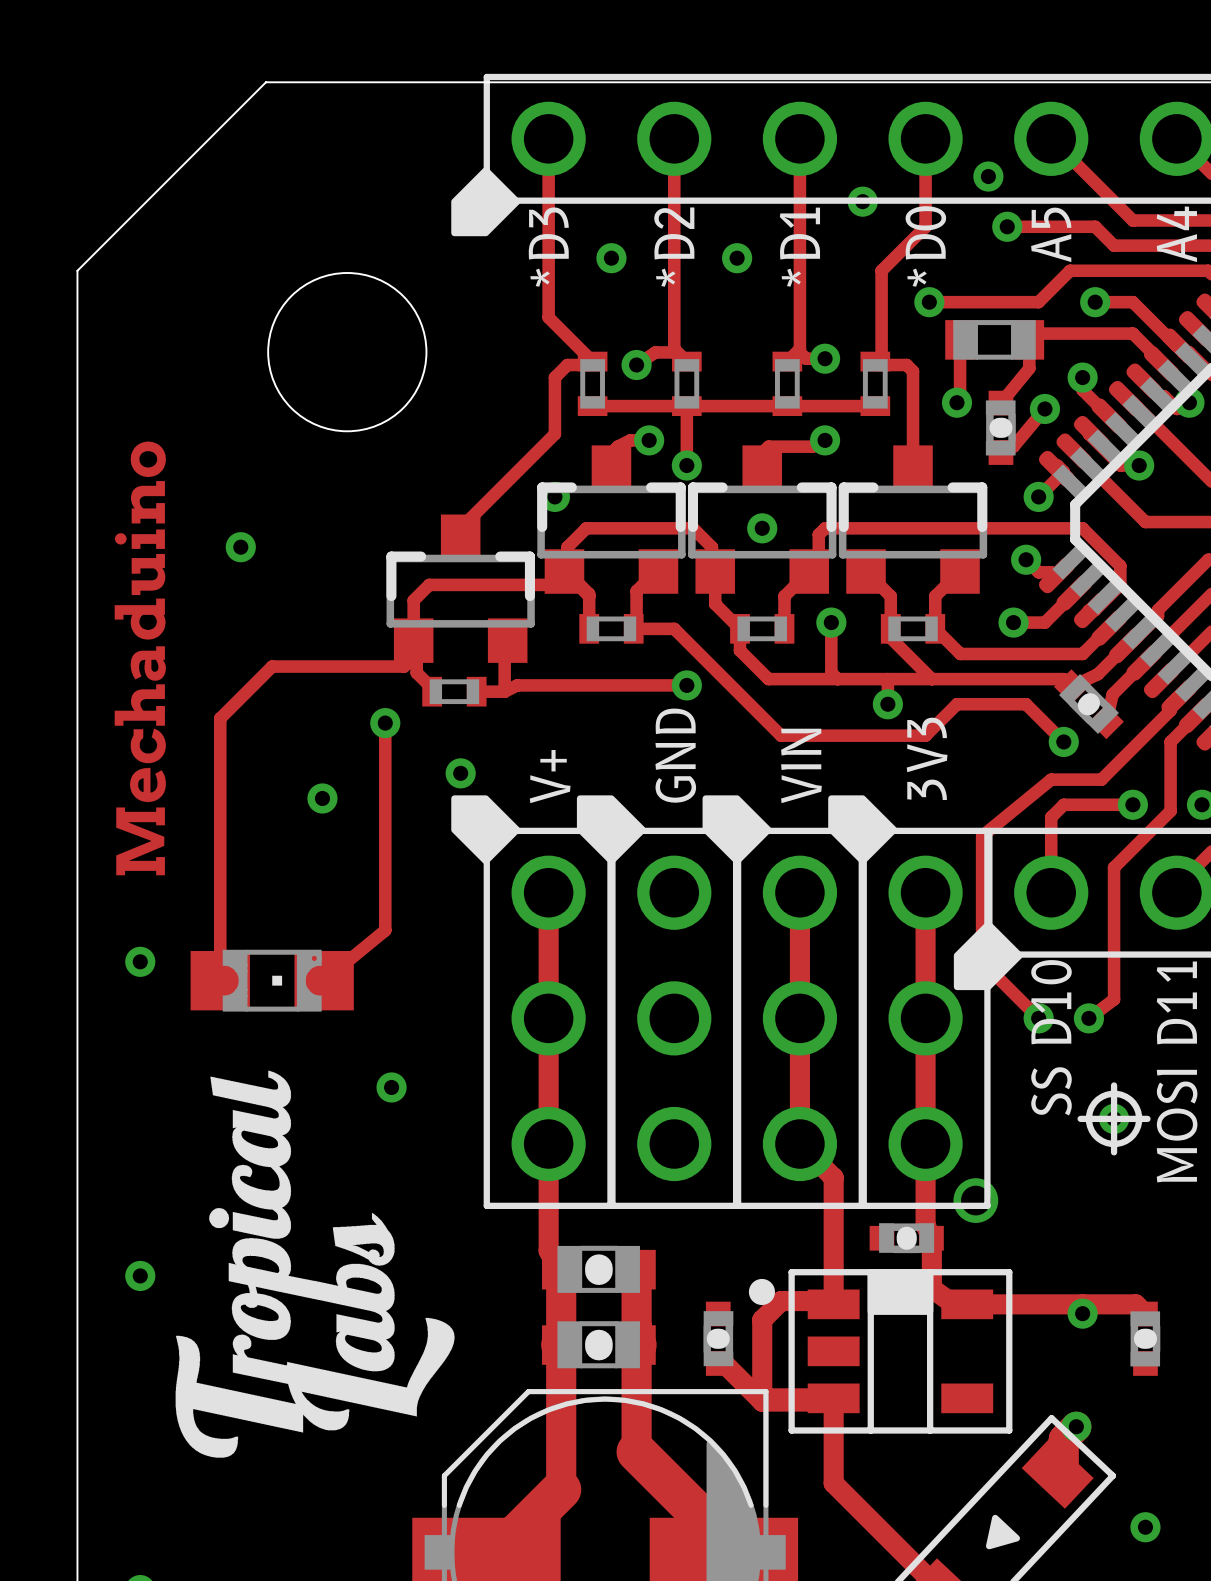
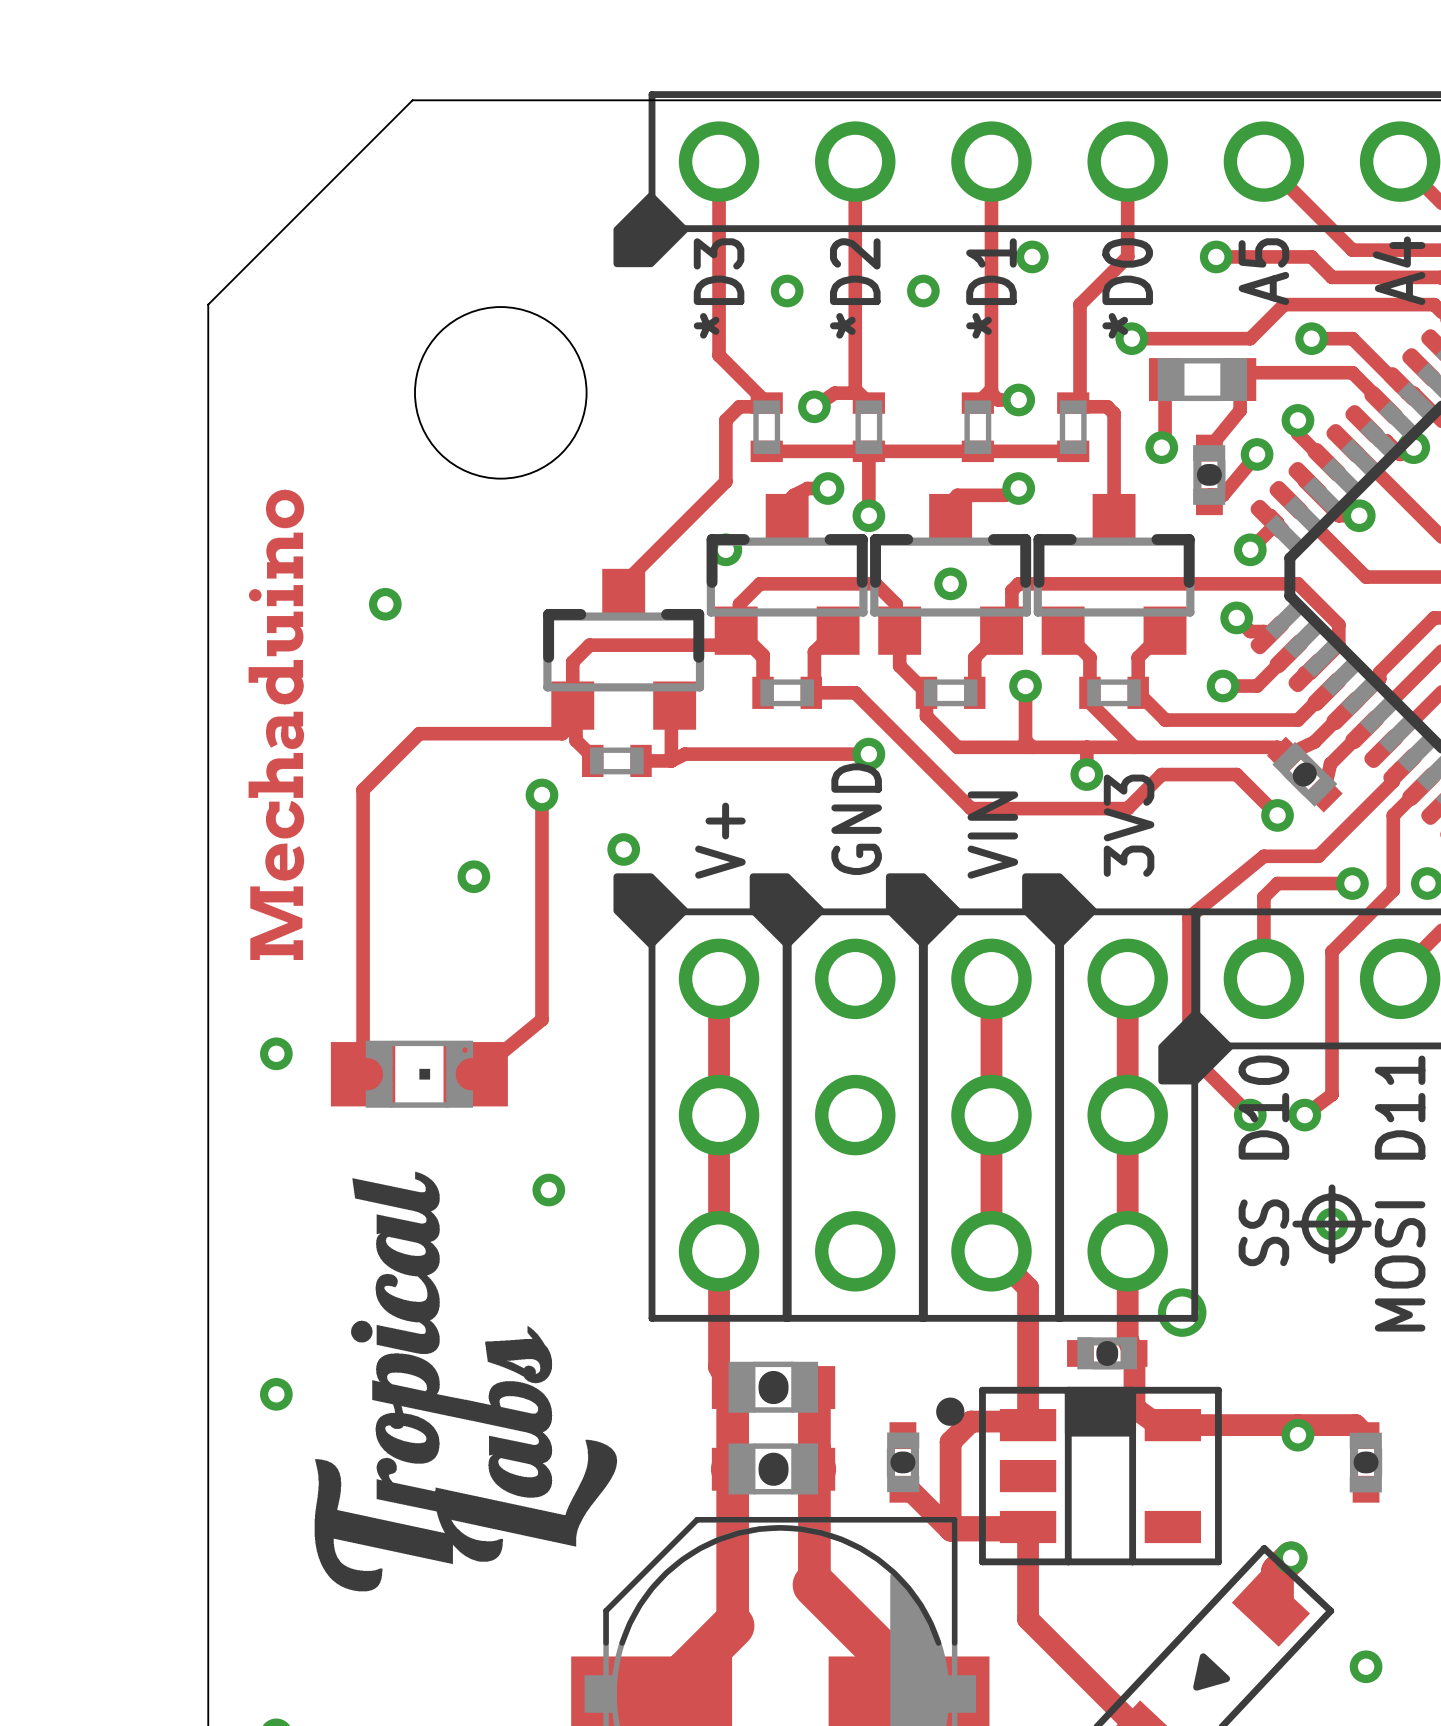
via: (988, 176) -> none
via position: (862, 201) -> (1032, 256)

